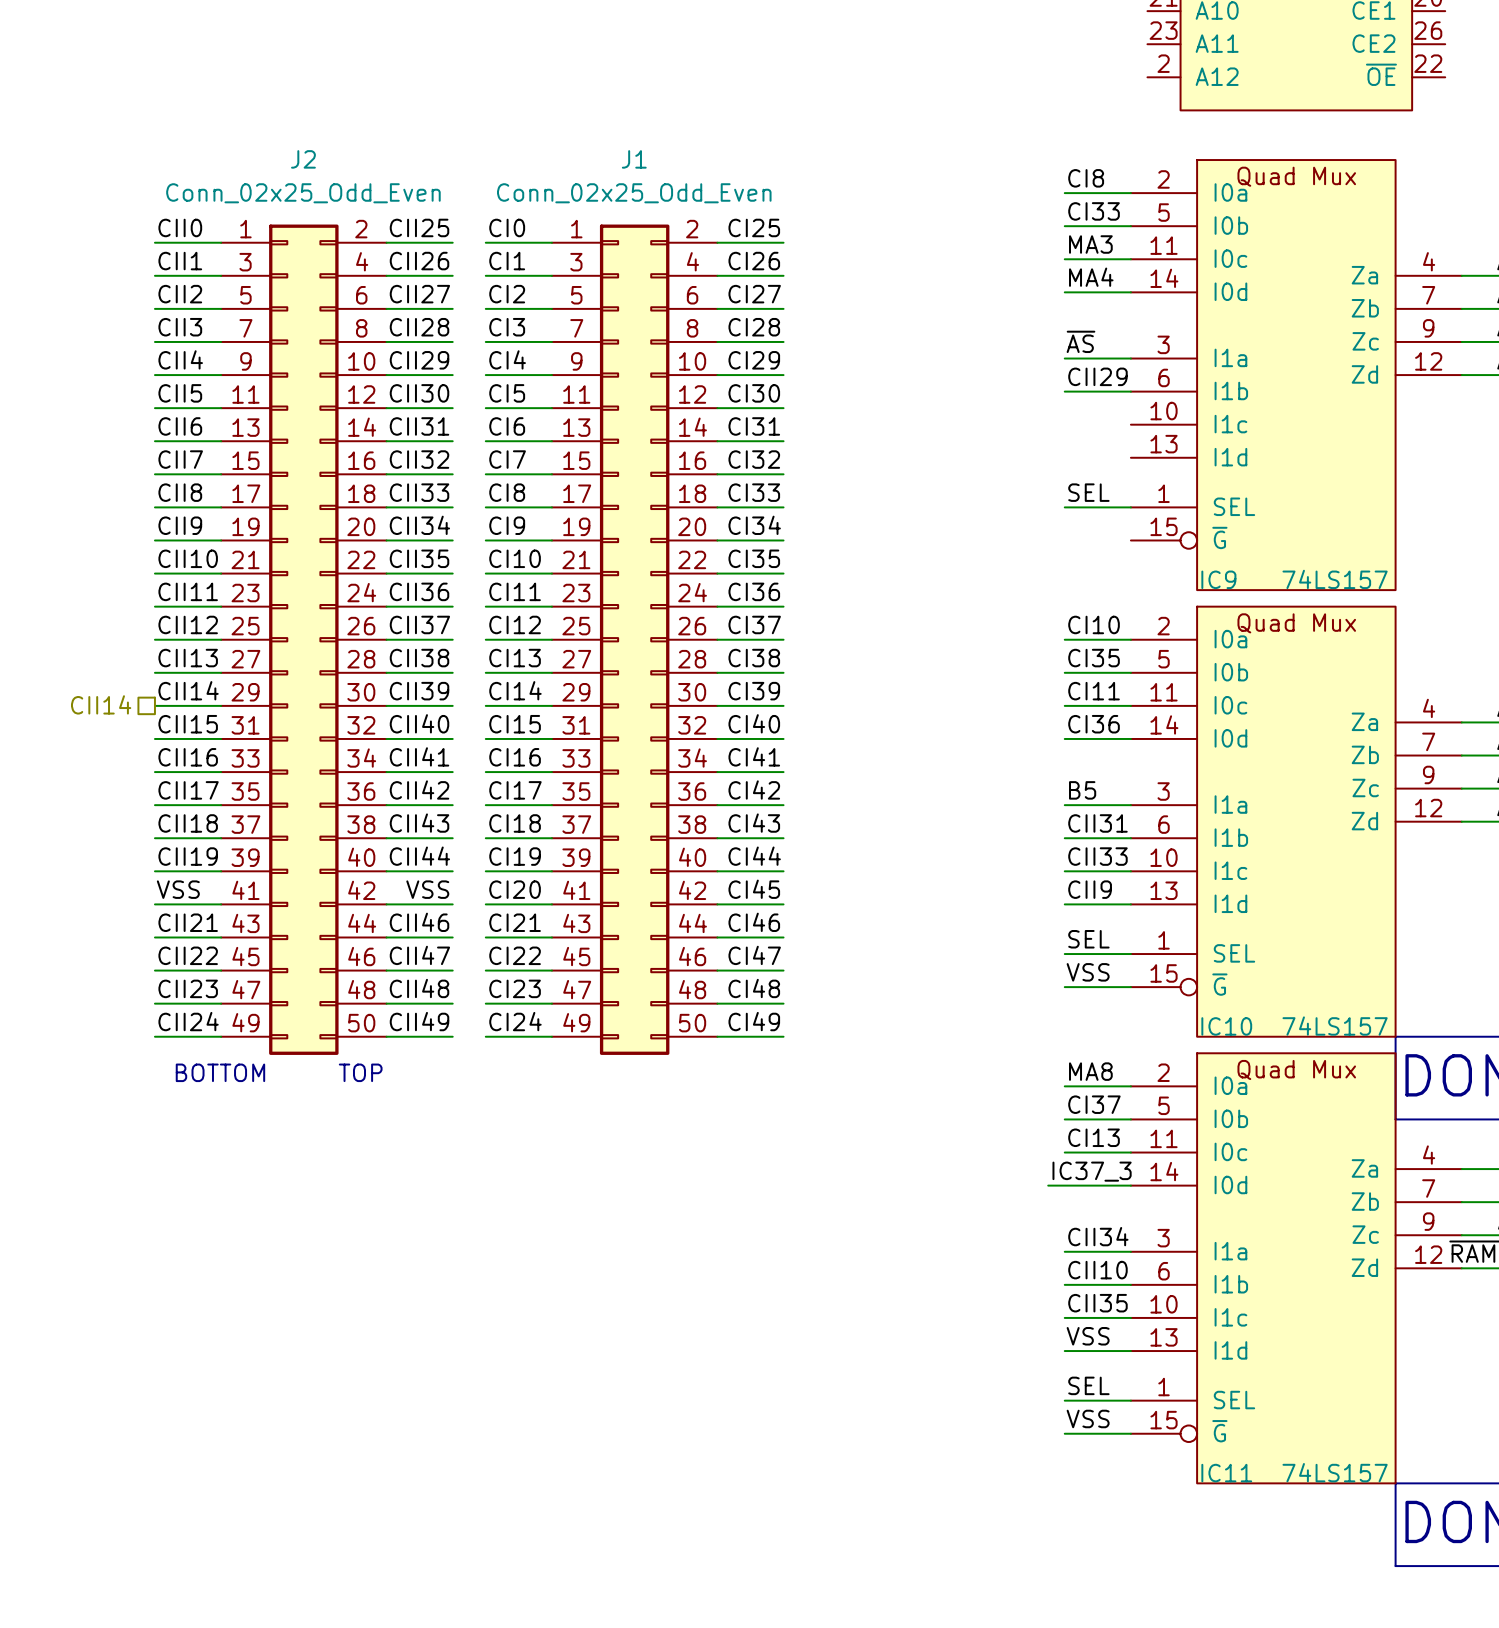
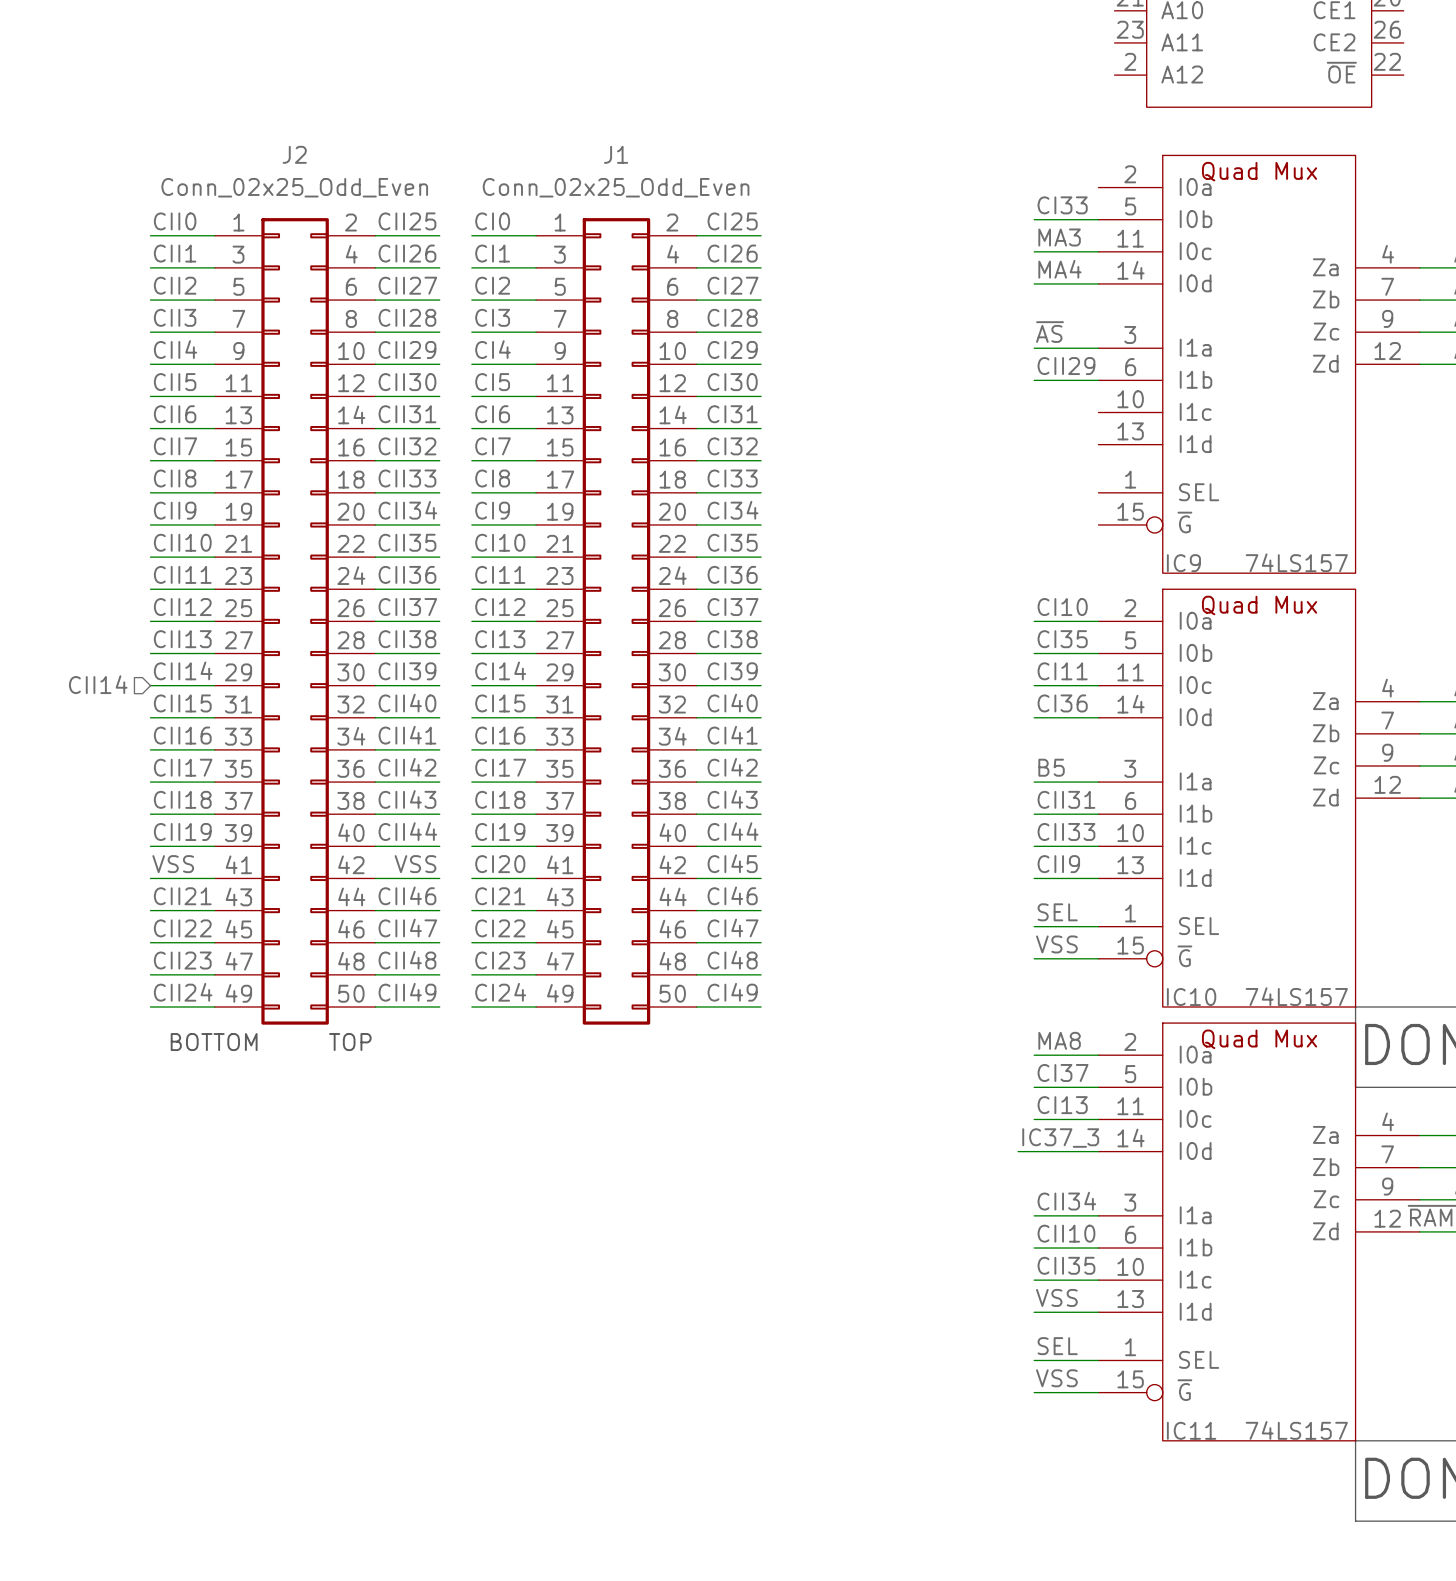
label: CI8 (1086, 178) -> none
wire: (1064, 193) (1130, 193) -> none
label: SEL (1088, 492) -> none
wire: (1064, 507) (1130, 507) -> none
hierarchical label shape: passive (101, 704) -> input (98, 684)

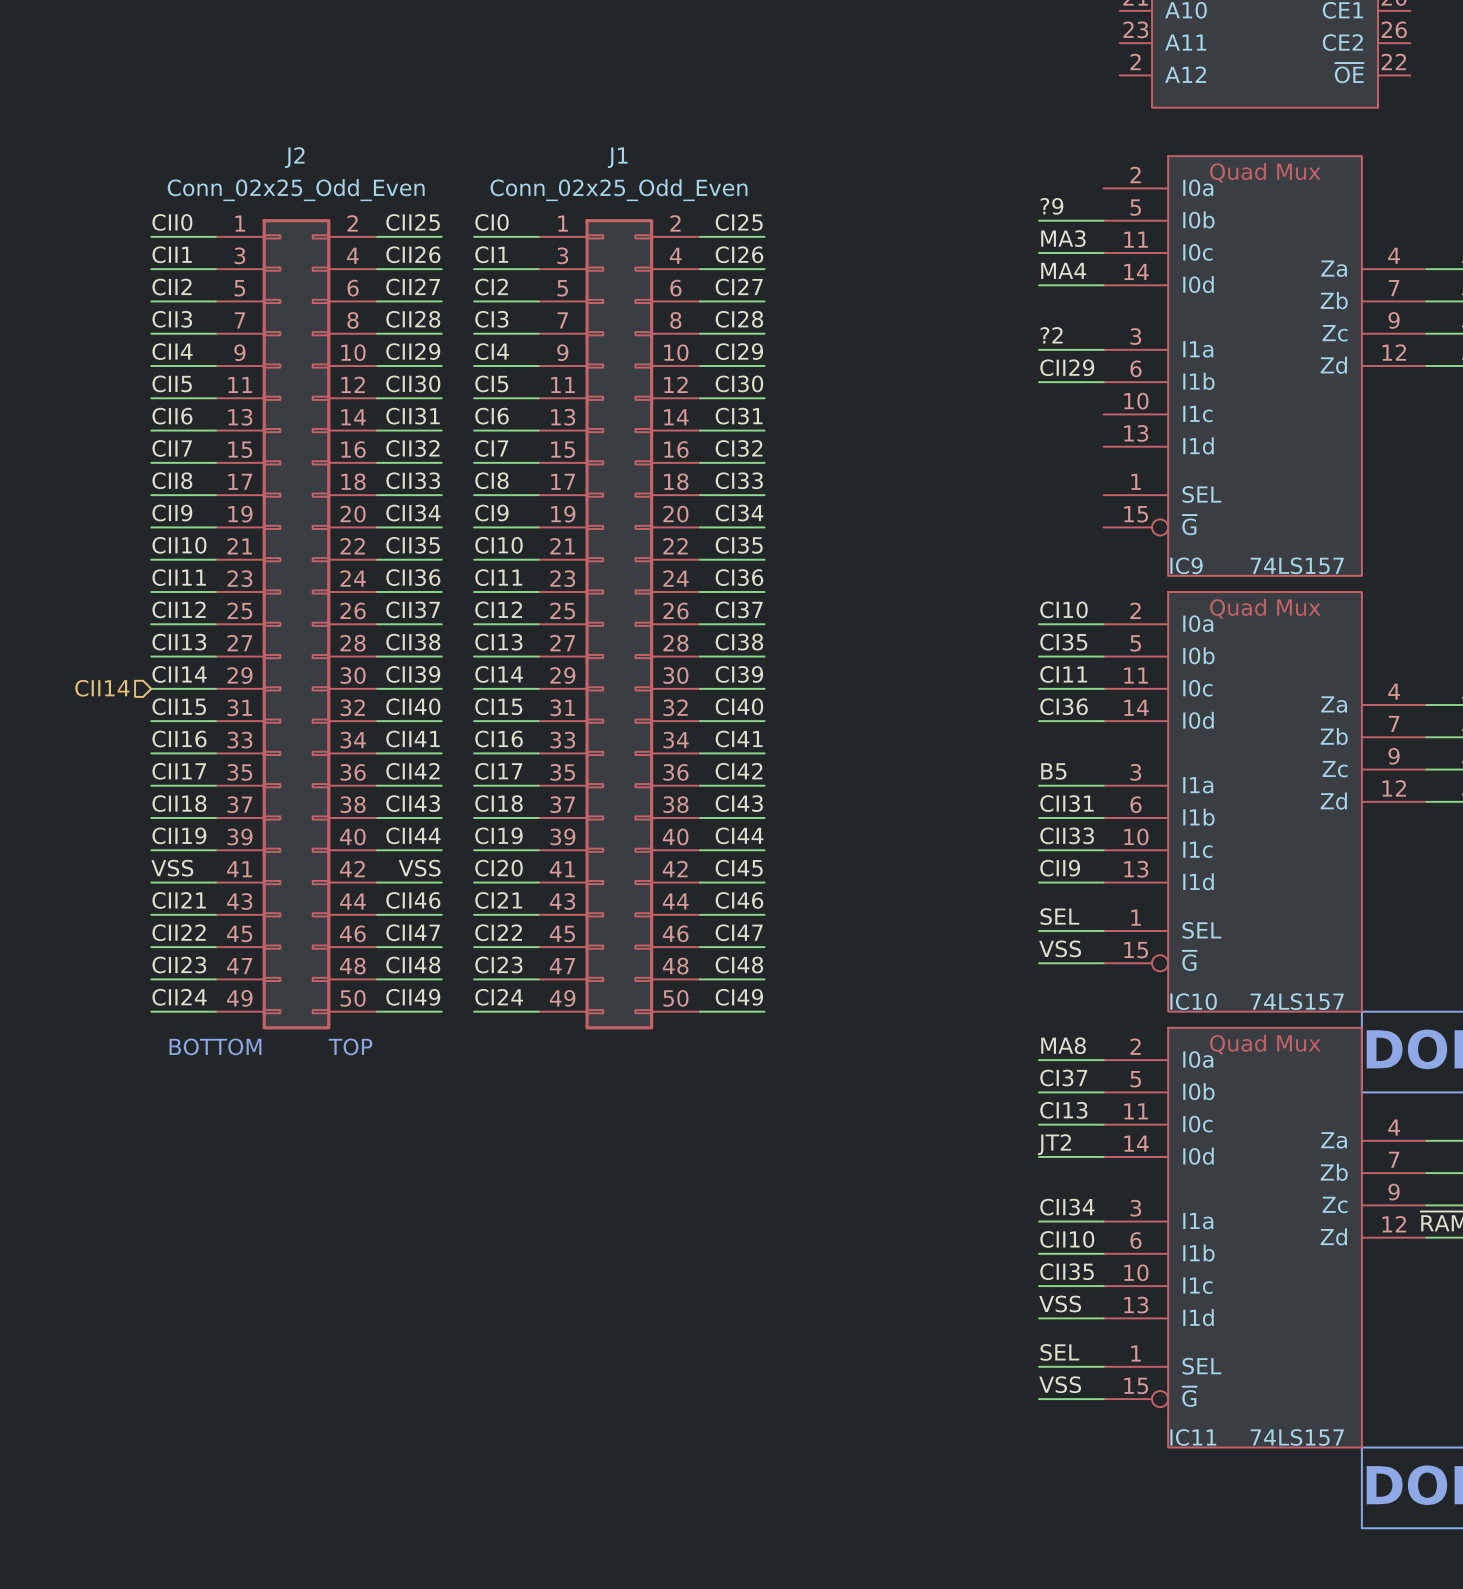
label: CI33 (1062, 205) -> ?9 (1051, 206)
label: ~{AS} (1049, 332) -> ?2 (1051, 335)
label: none -> JT2 (1054, 1144)
label: IC37_3 (1060, 1138) -> none
wire: (1018, 1151) (1034, 1151) -> none

